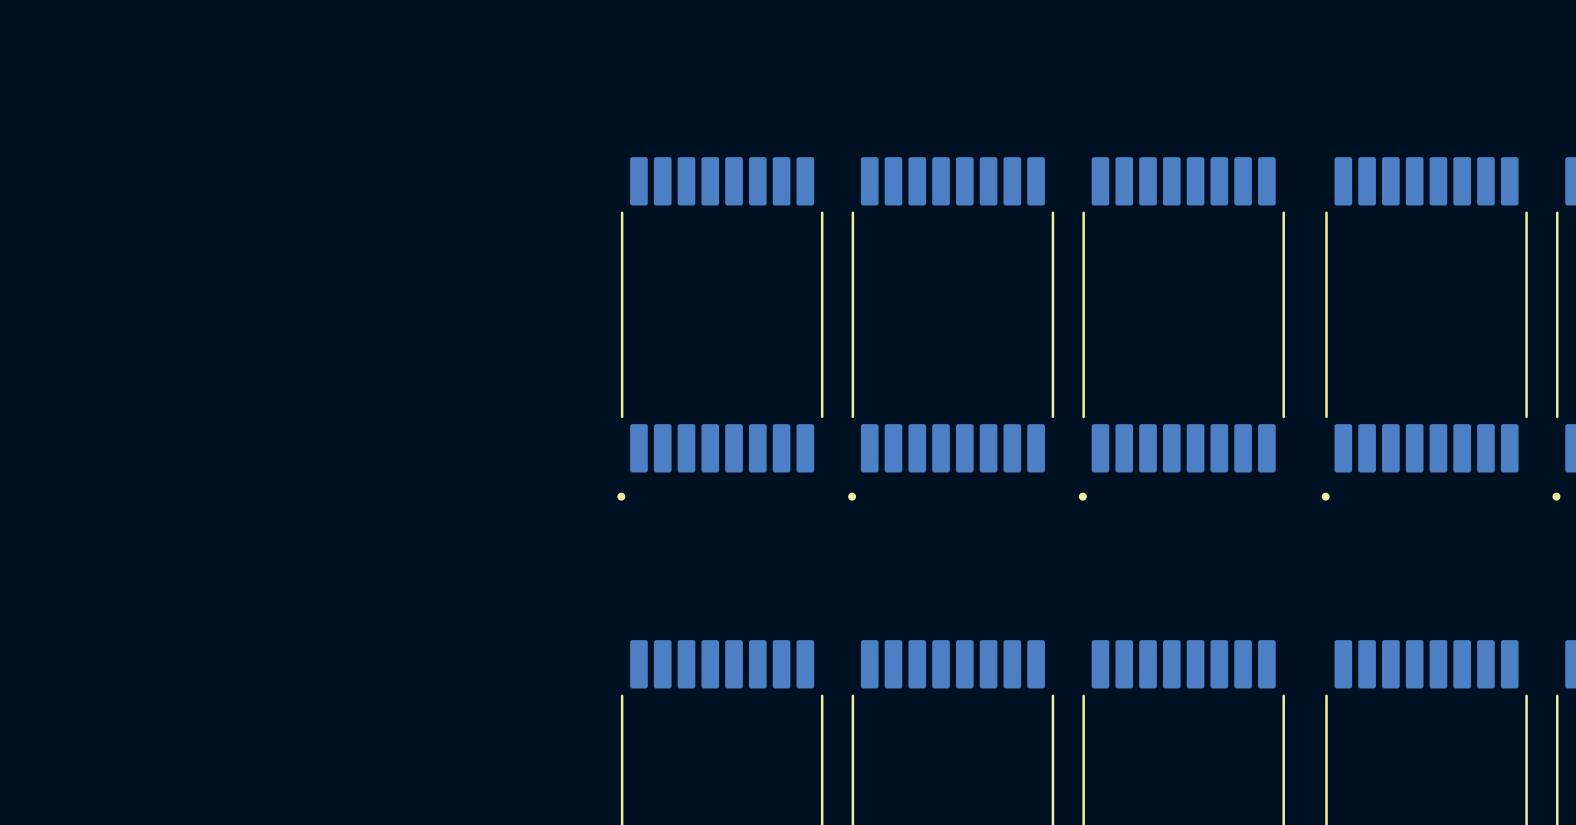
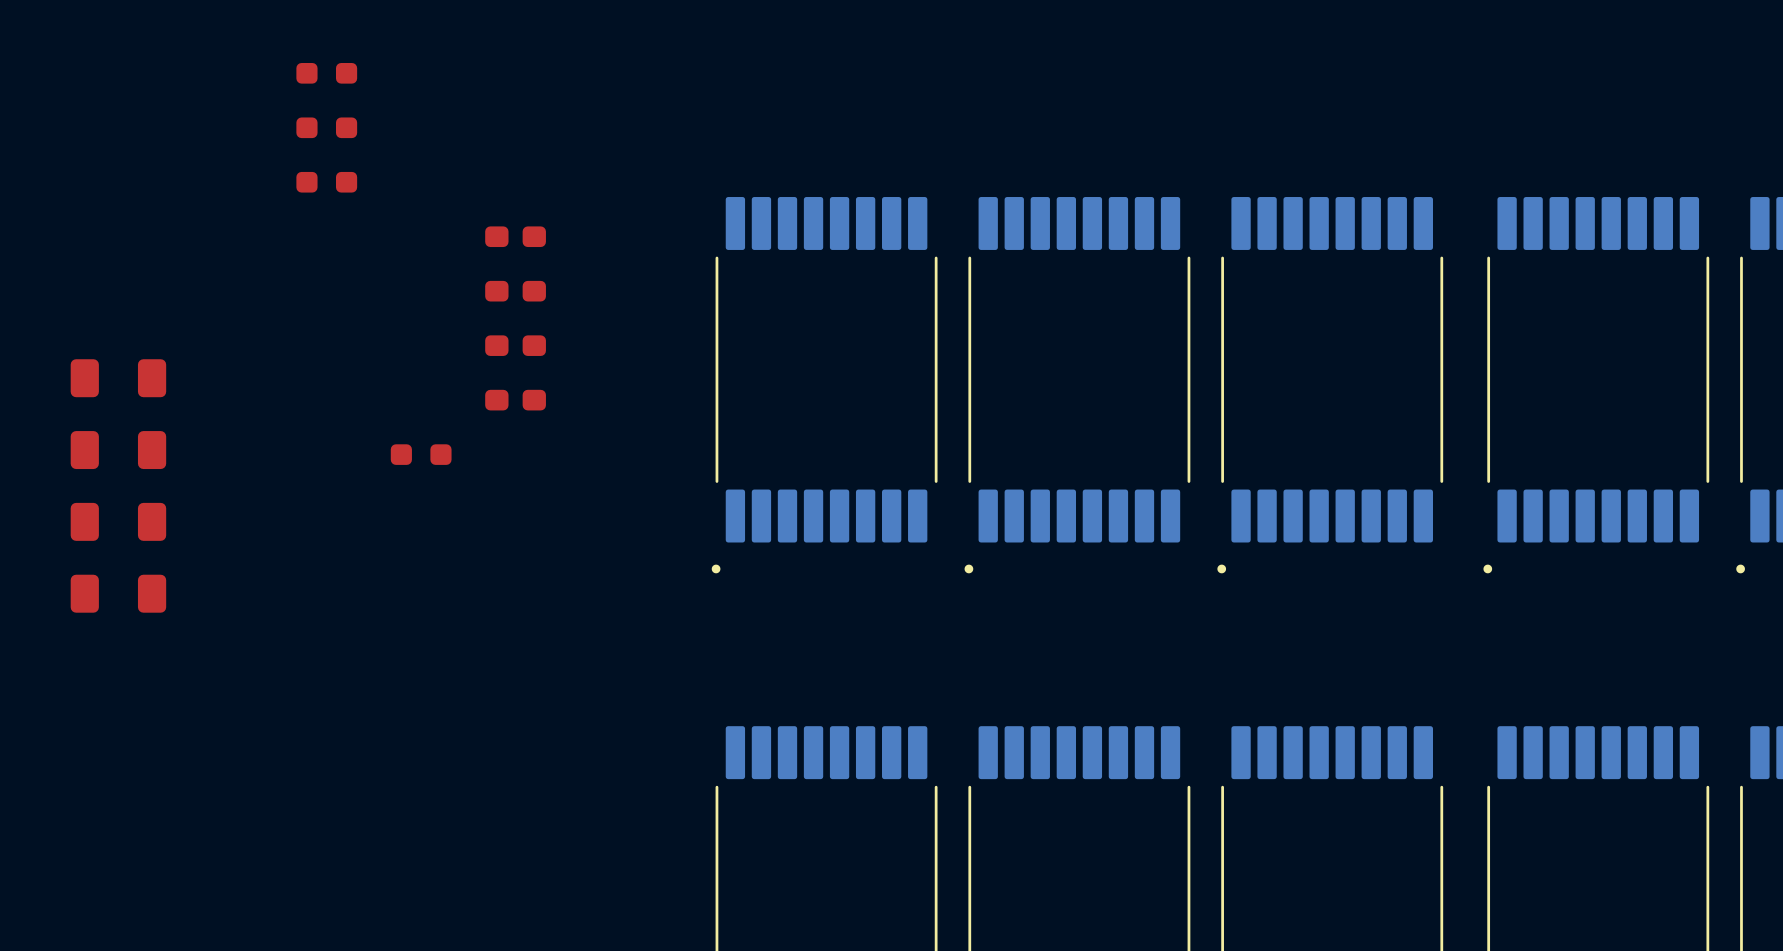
part: none -> (326, 73)
part: none -> (326, 127)
part: none -> (326, 182)
part: none -> (515, 236)
part: none -> (515, 291)
part: none -> (515, 345)
part: none -> (118, 378)
part: none -> (515, 400)
part: none -> (118, 450)
part: none -> (421, 454)
part: none -> (118, 521)
part: none -> (118, 593)

